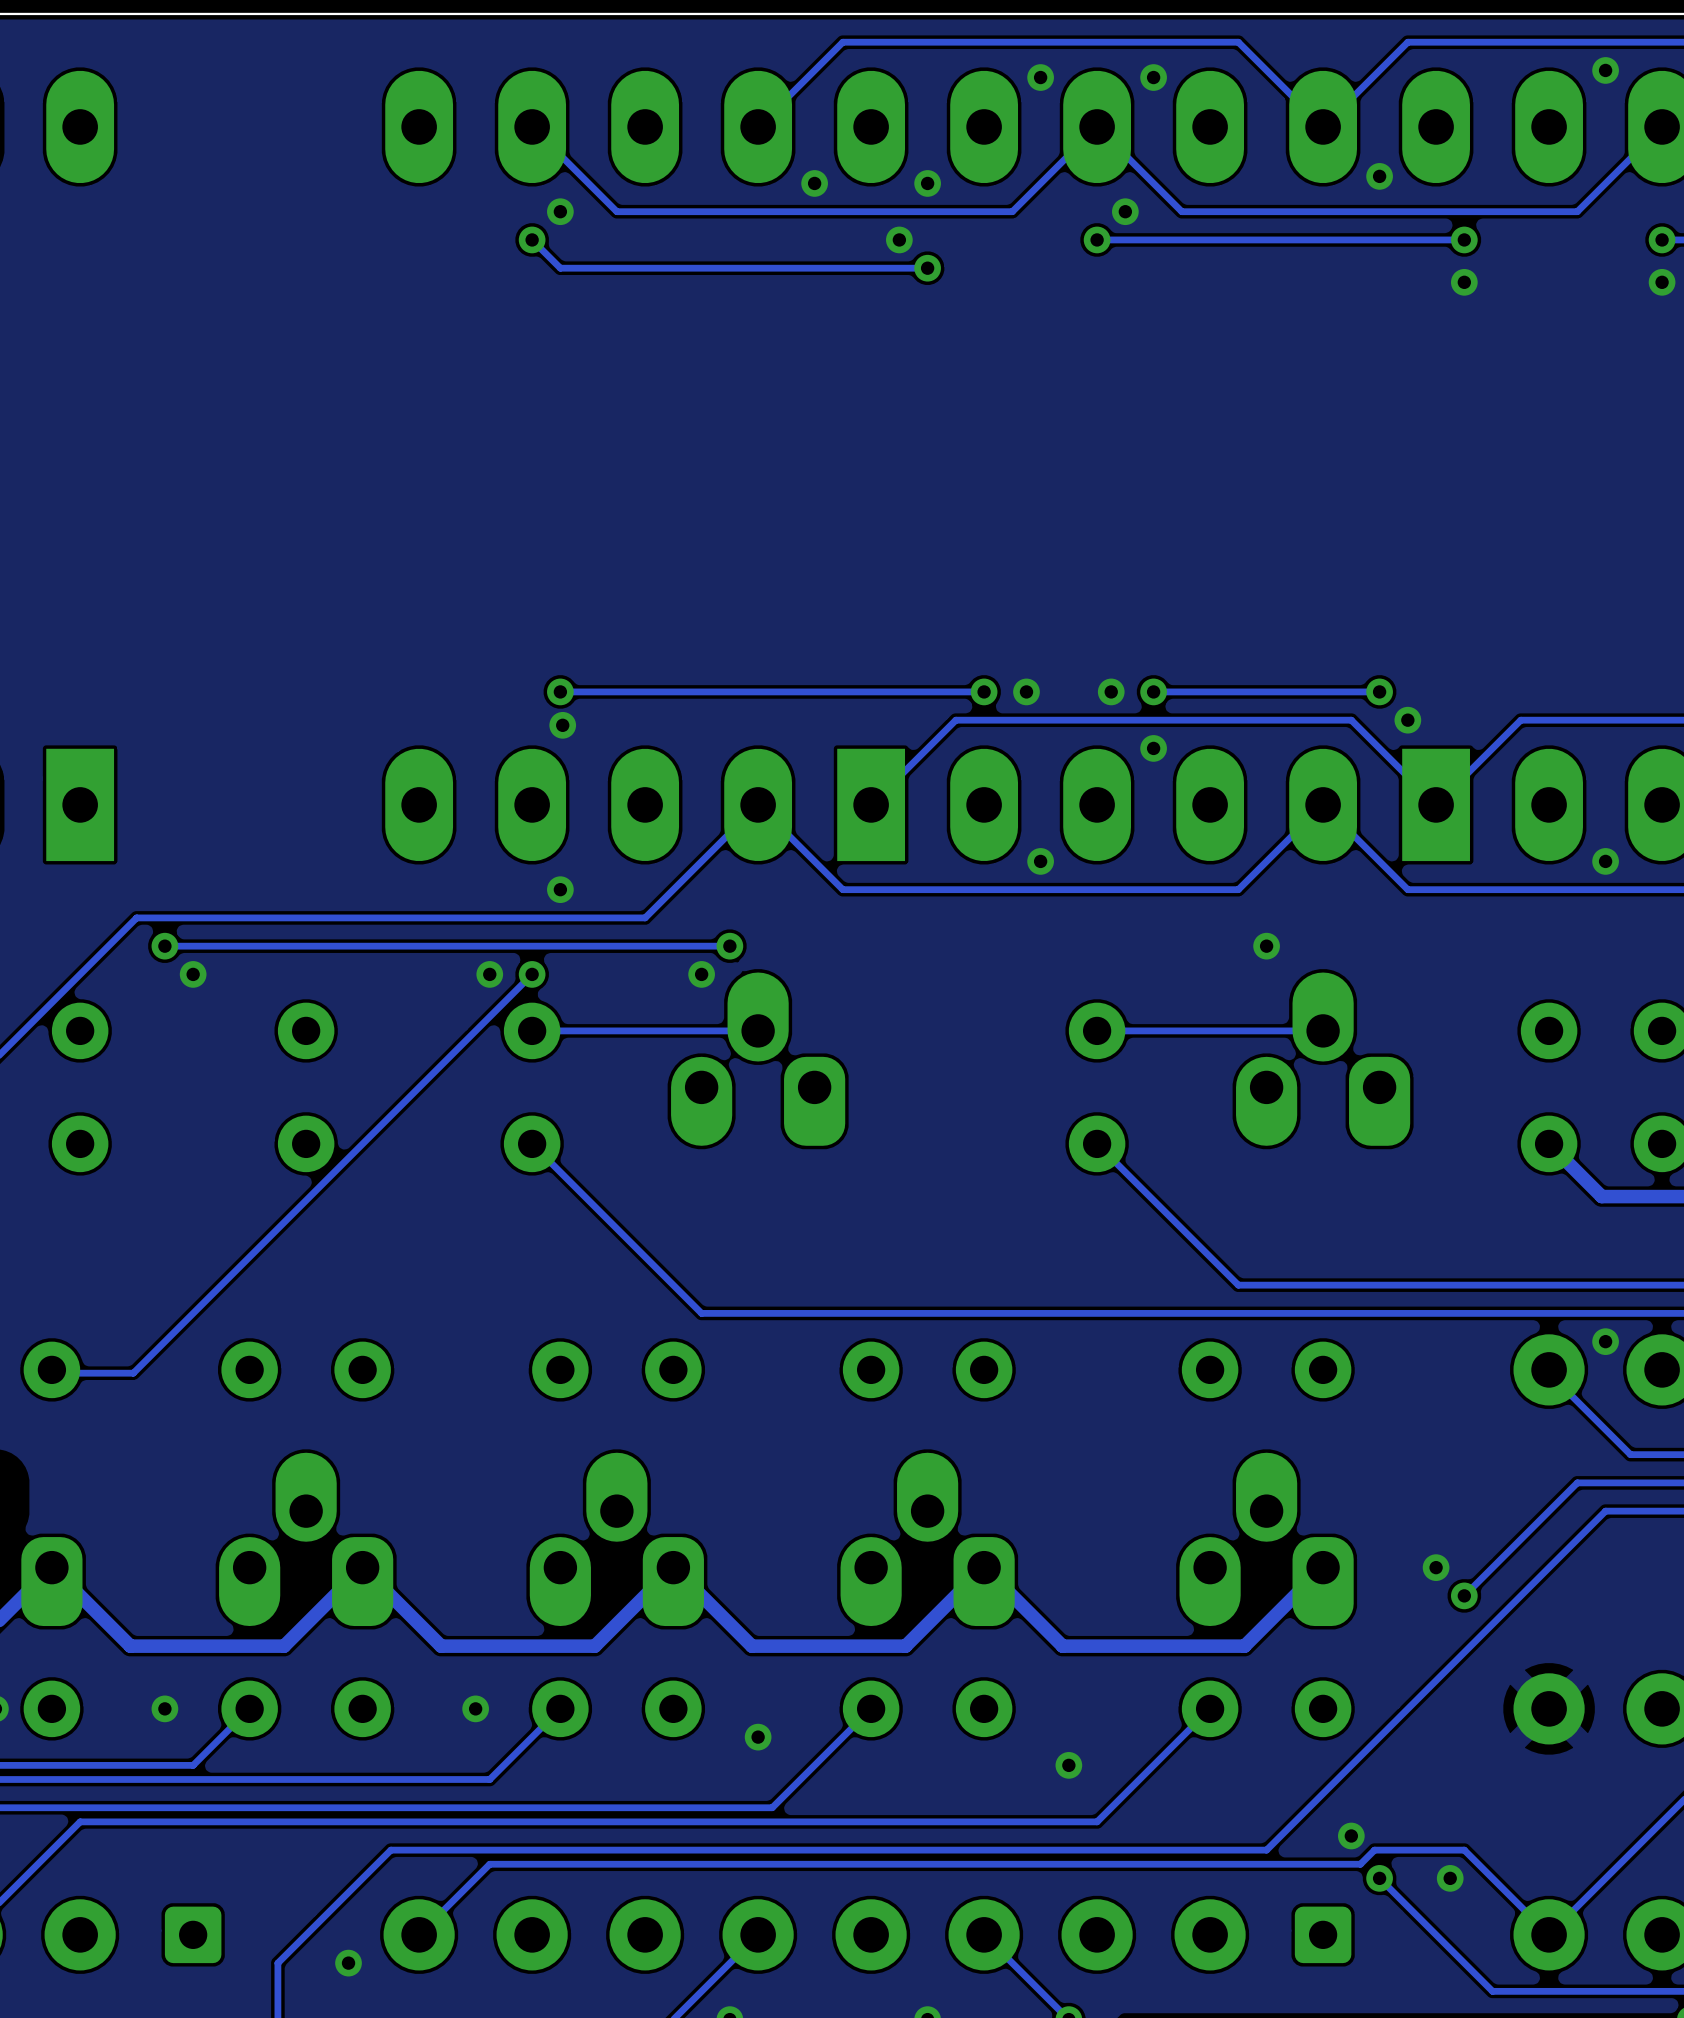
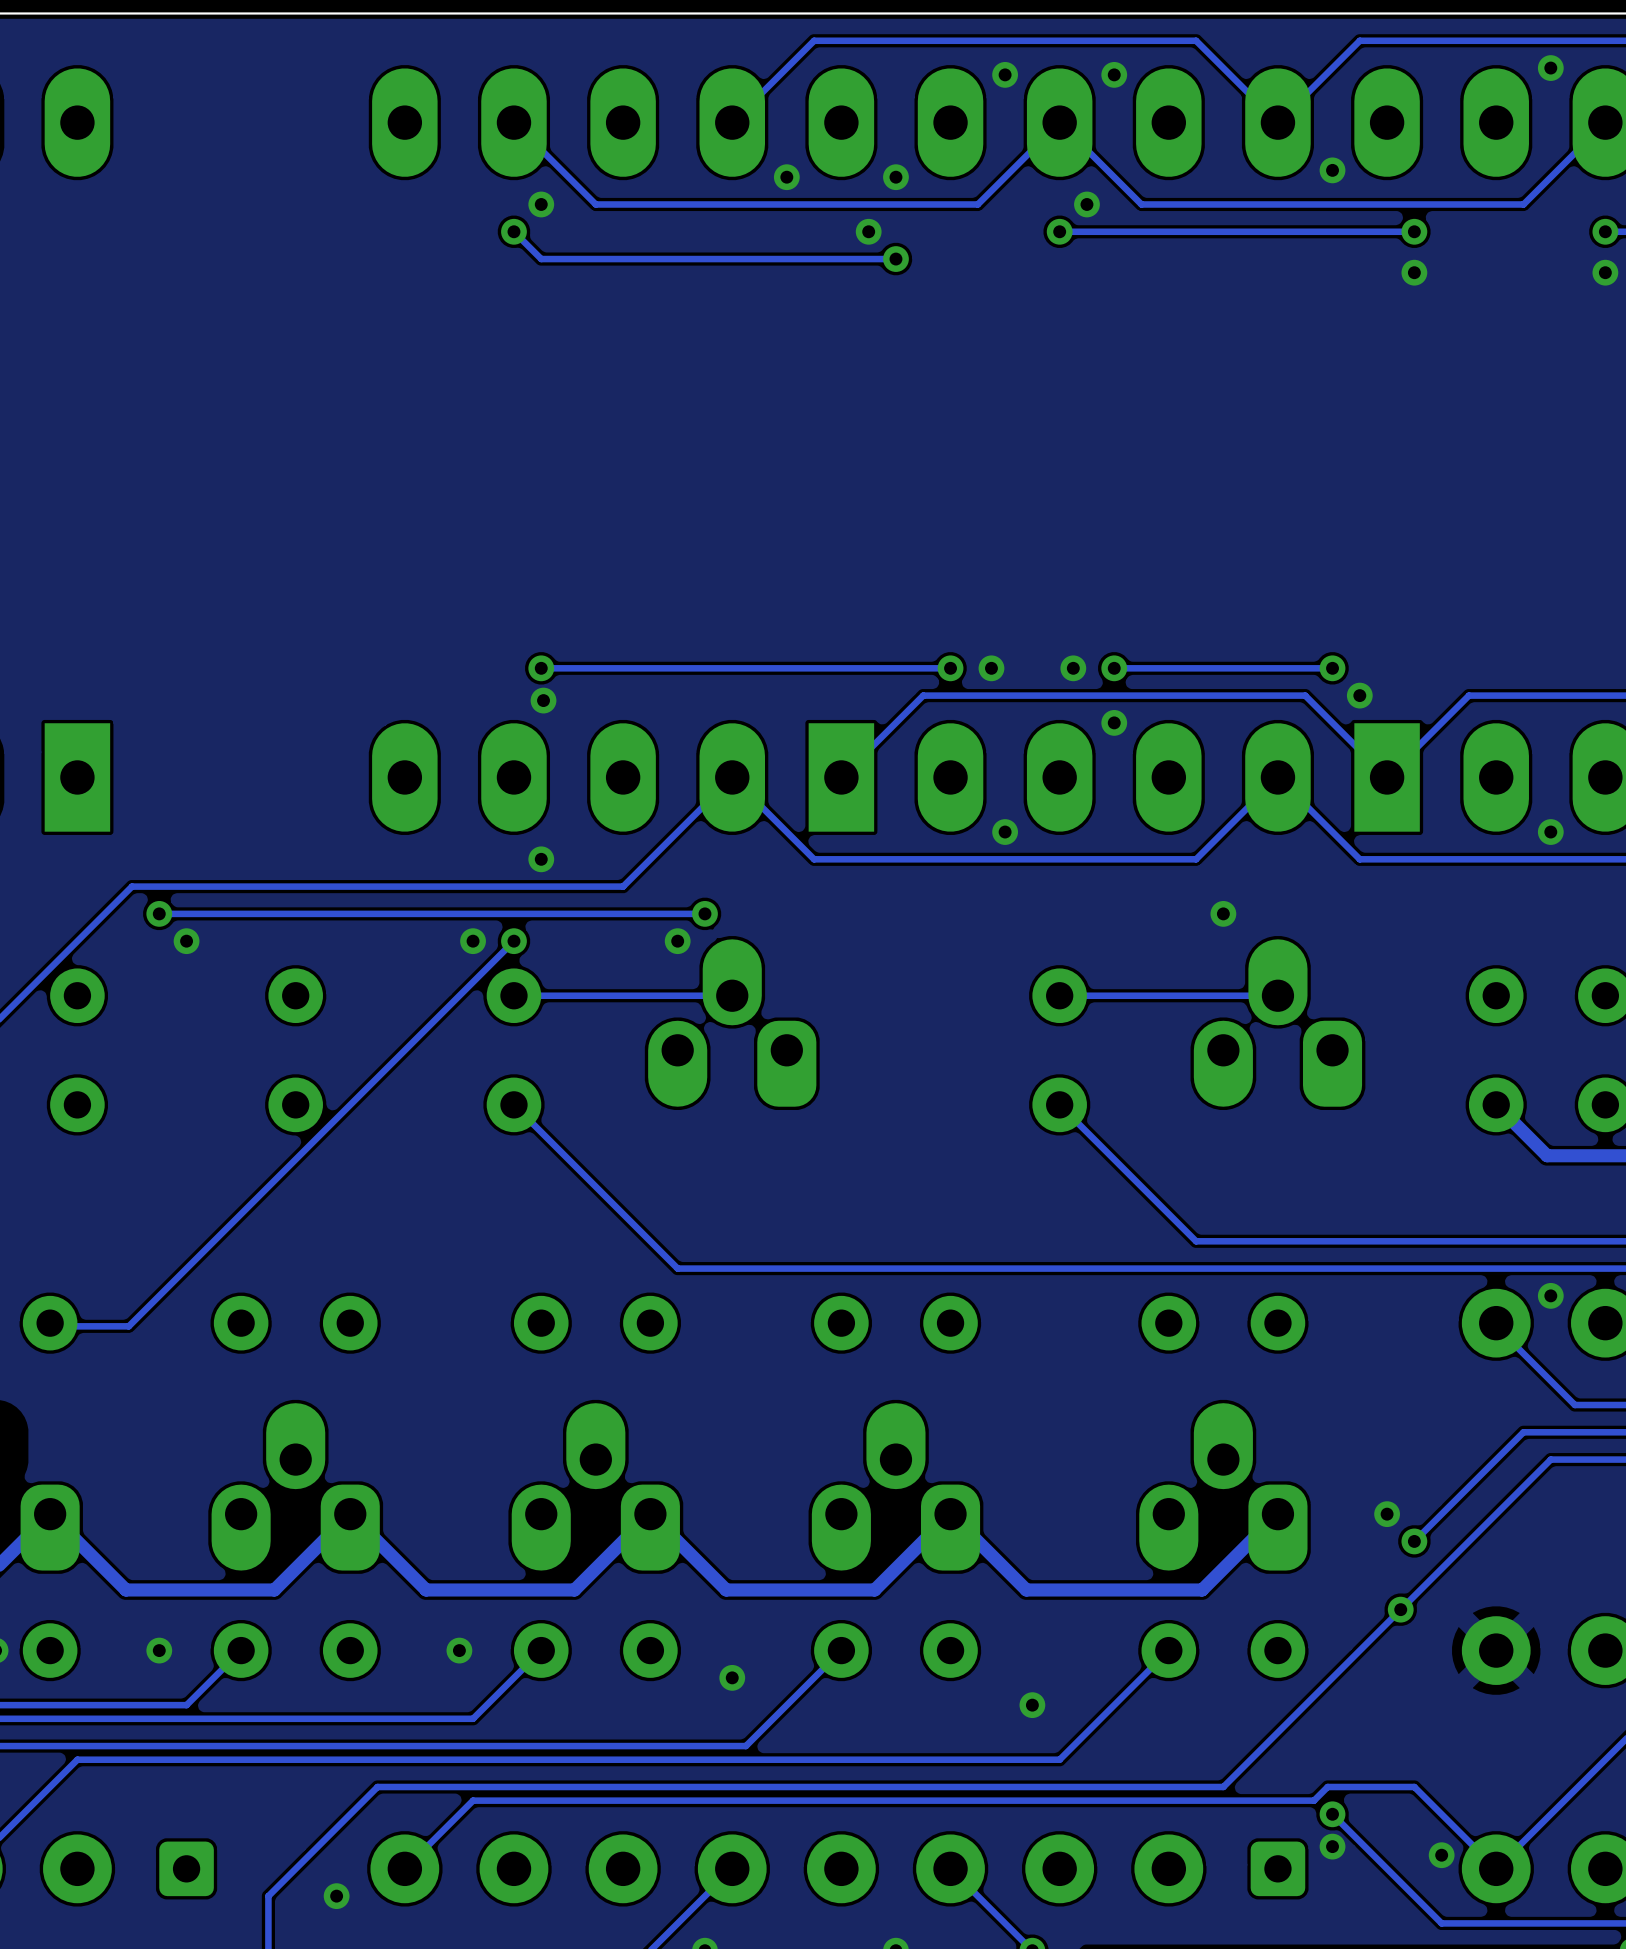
via: none -> (1400, 1609)
via: (1351, 1836) -> none
via: (1450, 1878) -> none
via: none -> (1332, 1846)
via: none -> (1441, 1855)

